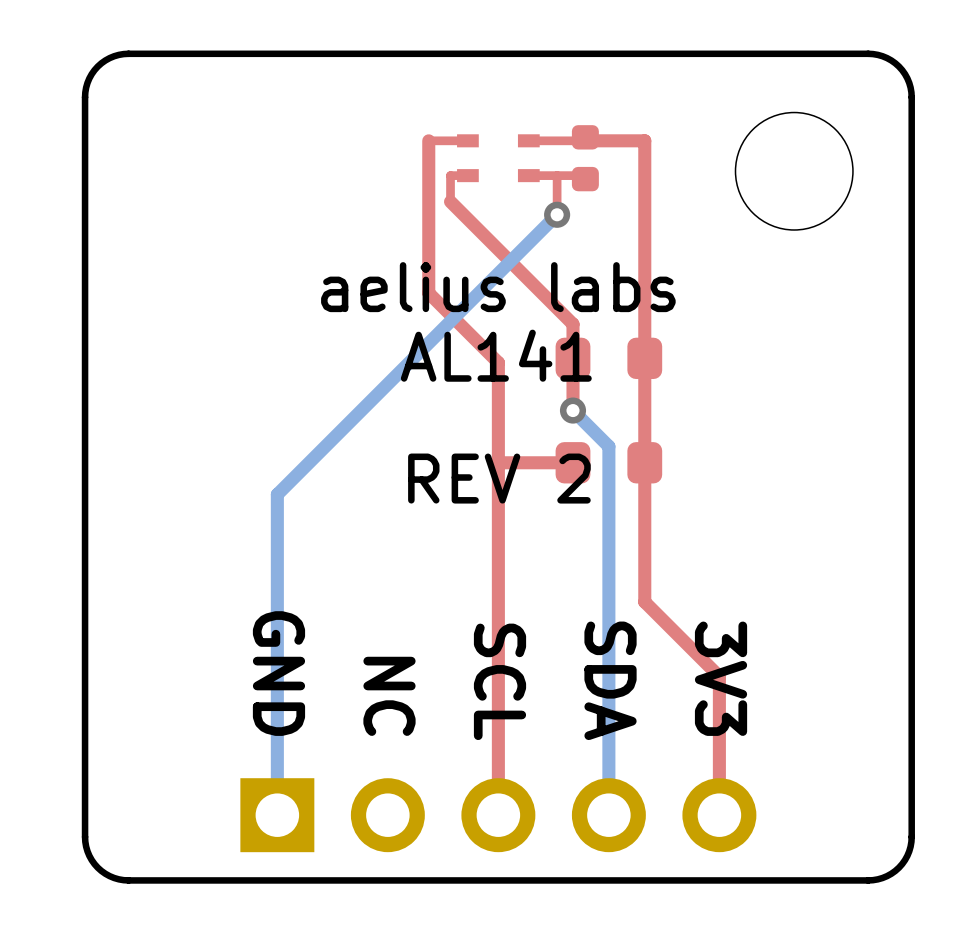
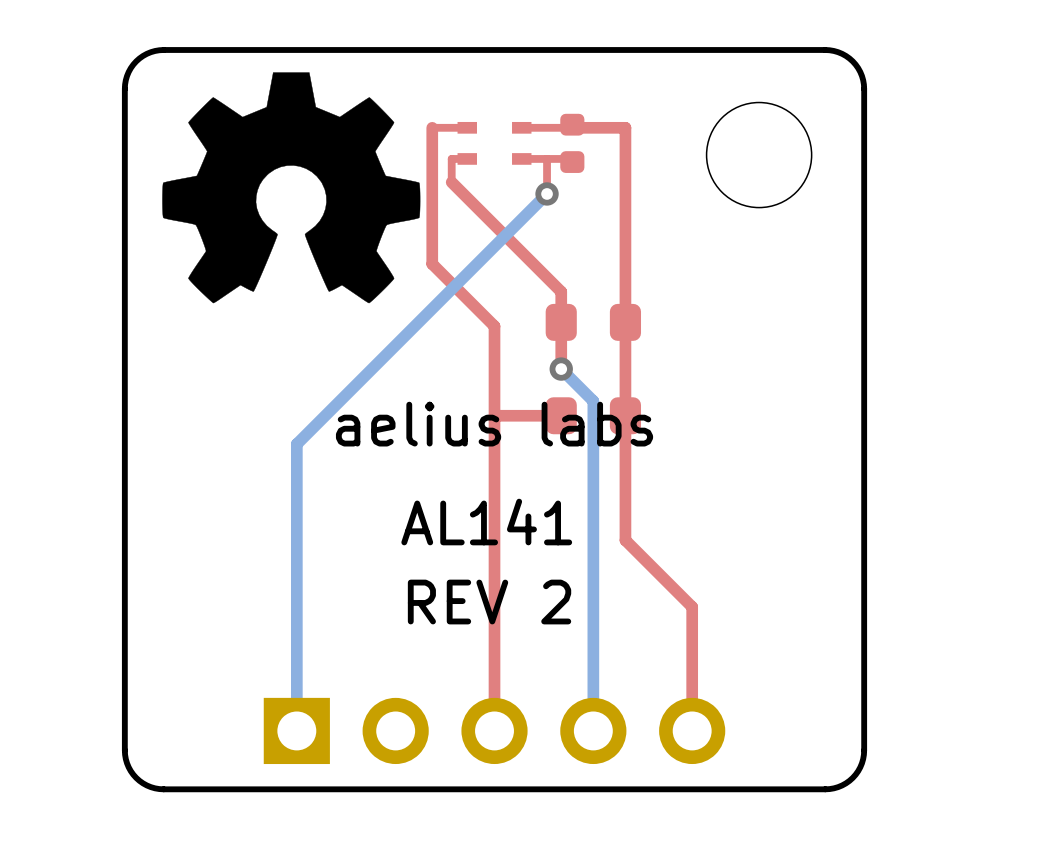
drawing: none -> [162, 72, 421, 304]
text: aelius labs (498, 287) -> none
text position: AL141 (496, 355) -> AL141 (486, 522)
text: REV 2 (499, 478) -> aelius labs (494, 424)
text: none -> REV 2 (489, 602)
text: GND (278, 673) -> none
text: 3V3 (721, 678) -> none
text: SDA (610, 680) -> none
text: SCL (500, 681) -> none
text: NC (389, 696) -> none

